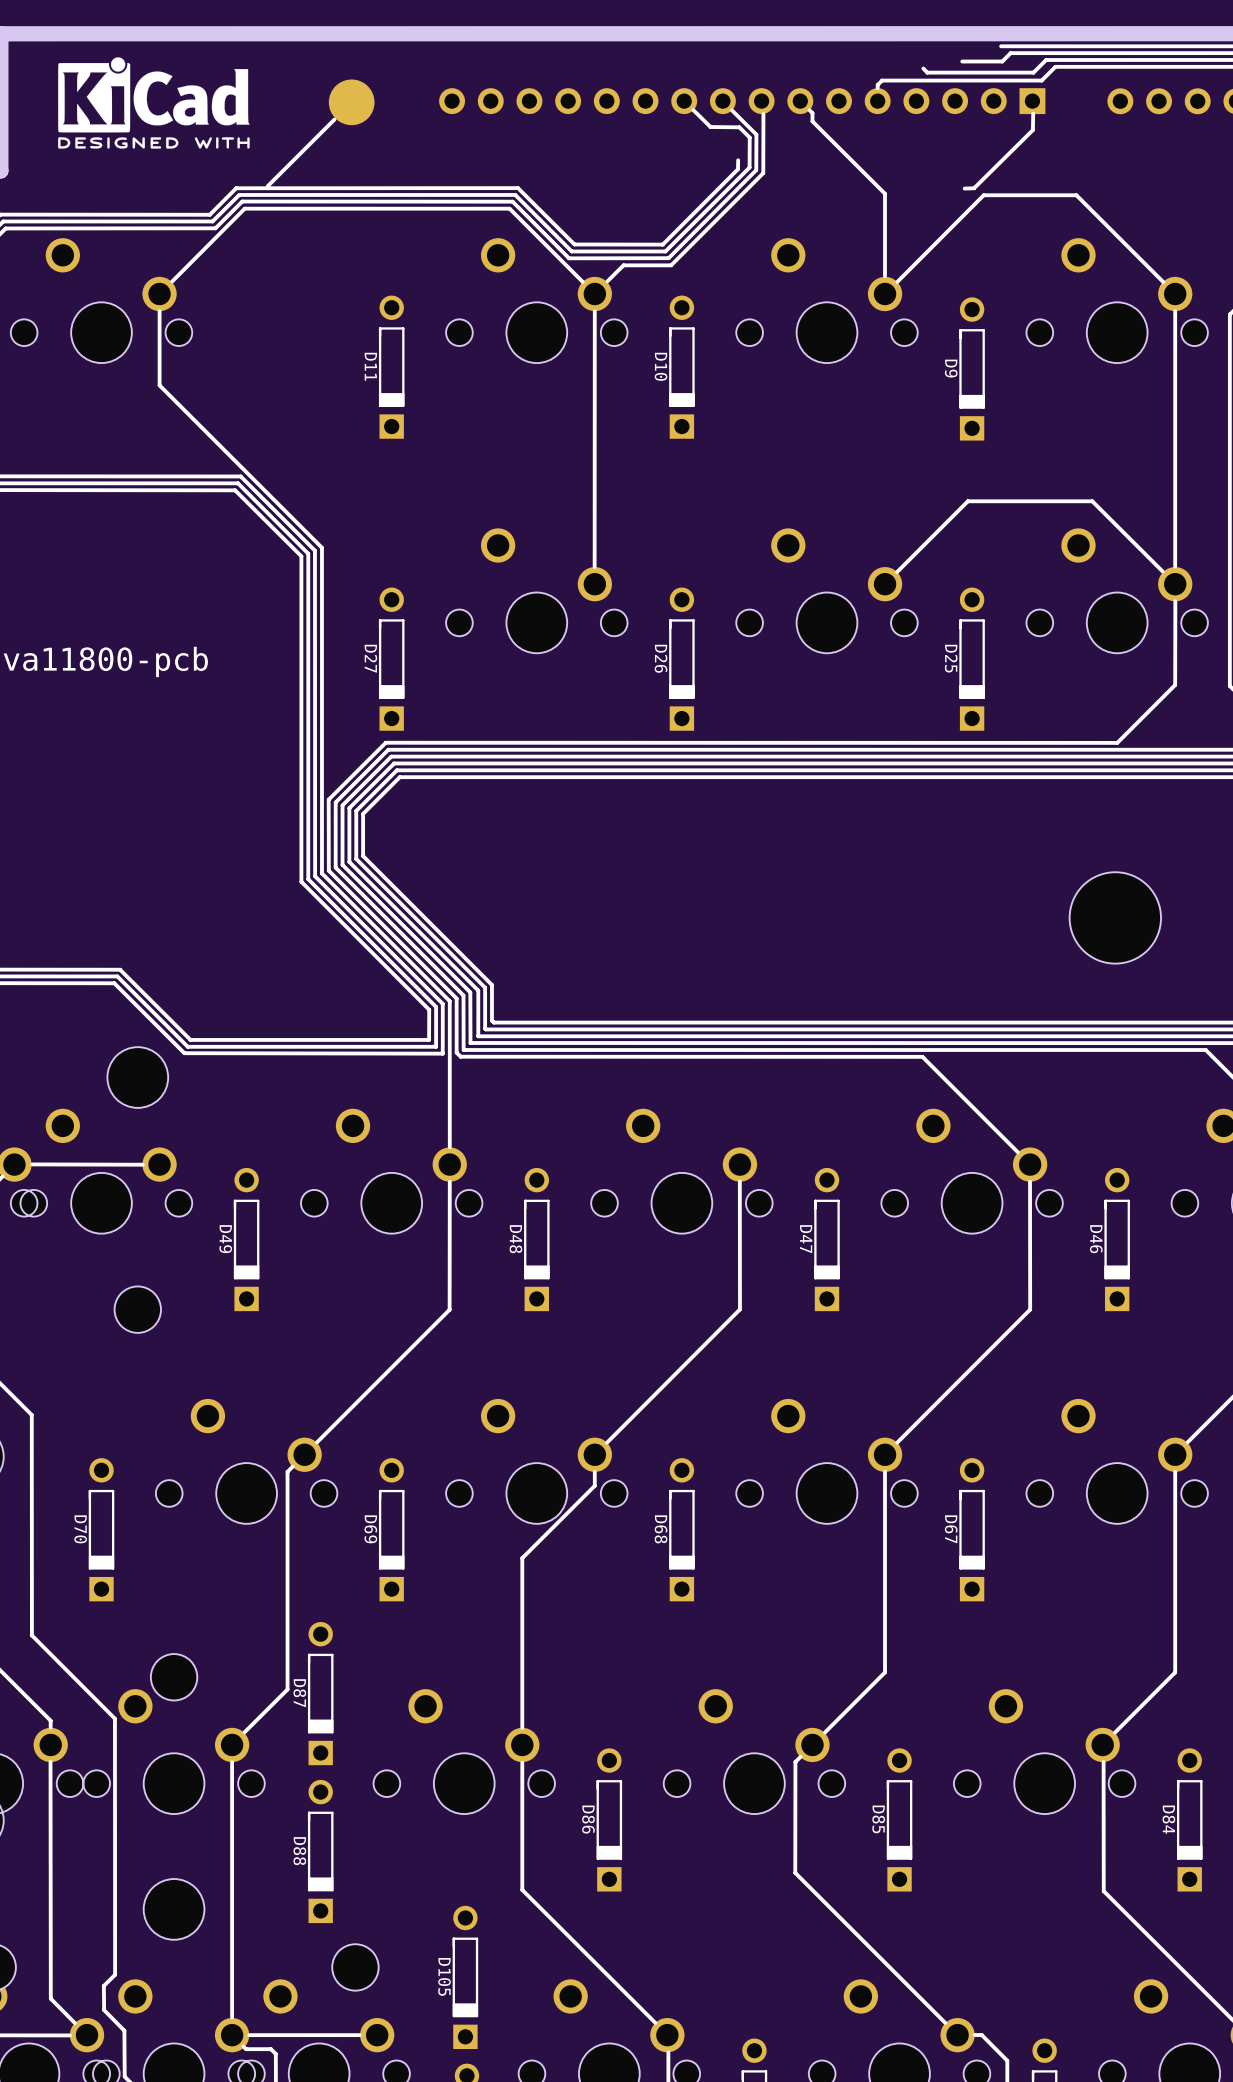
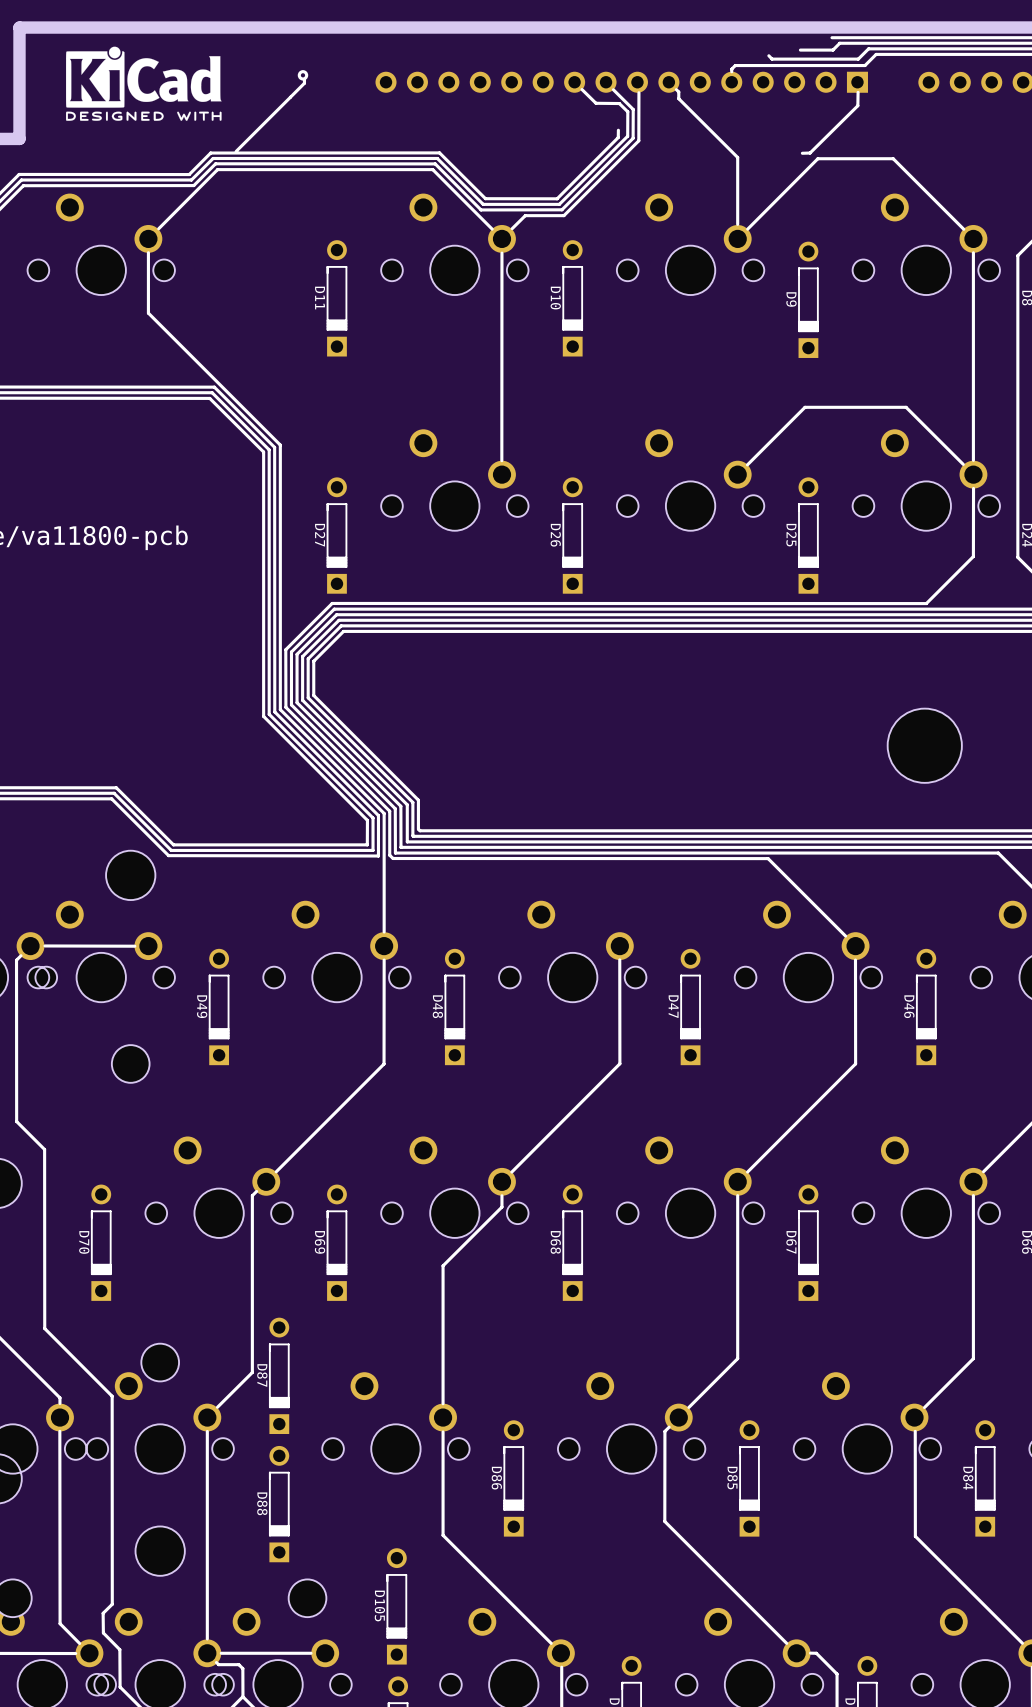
drawing: none -> [297, 70, 309, 81]
line: none -> (304, 79) (304, 83) (290, 97)
part: (351, 102) -> none

